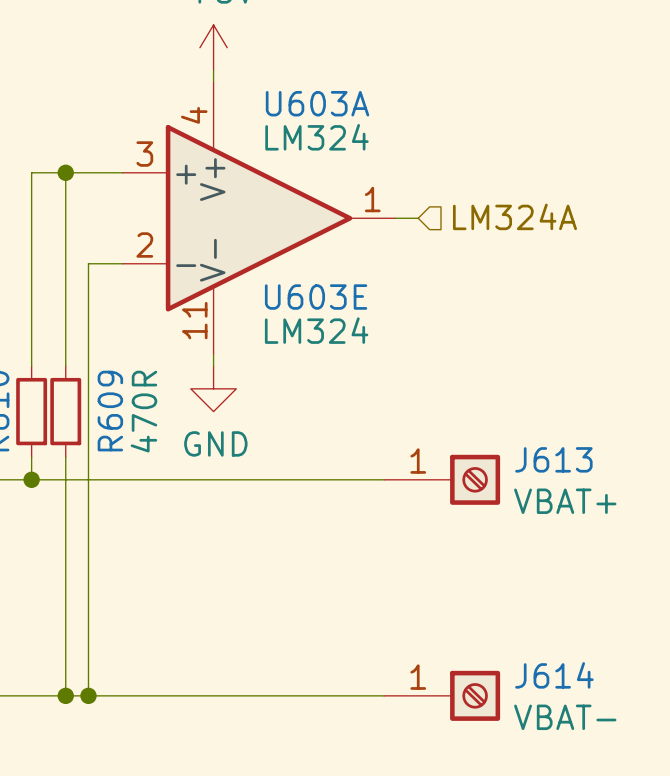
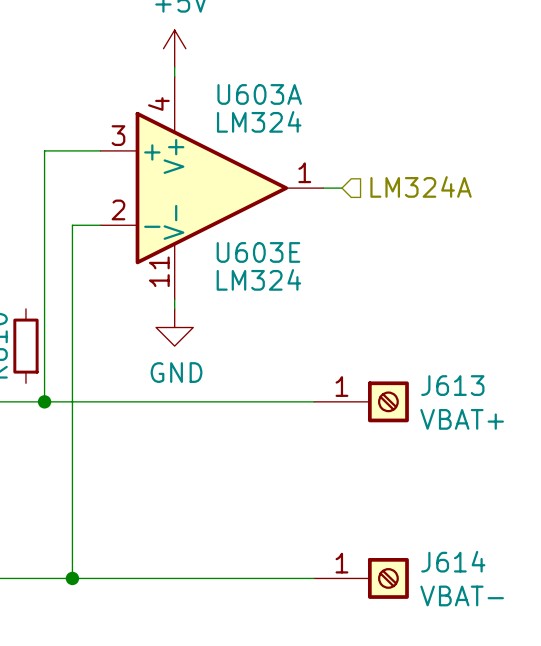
wire: (54, 172) (31, 172) (31, 366) -> (44, 150) (44, 401)
wire: (65, 172) (65, 366) -> none
junction: (65, 172) -> none
R609: 470R (65, 411) -> none
wire: (31, 457) (31, 479) -> none
wire: (65, 457) (65, 695) -> none
junction position: (31, 479) -> (44, 401)
junction: (65, 695) -> none

